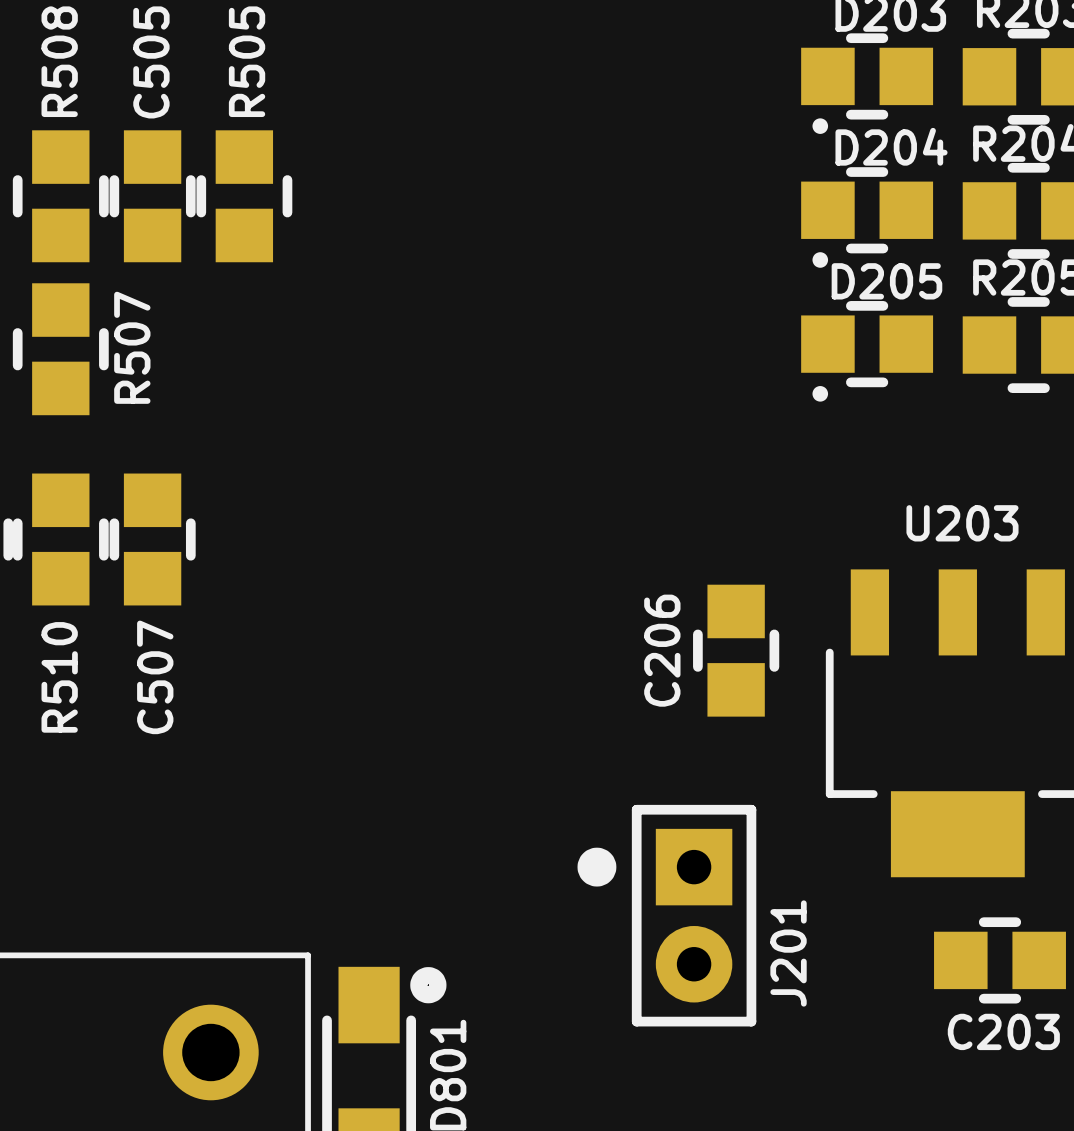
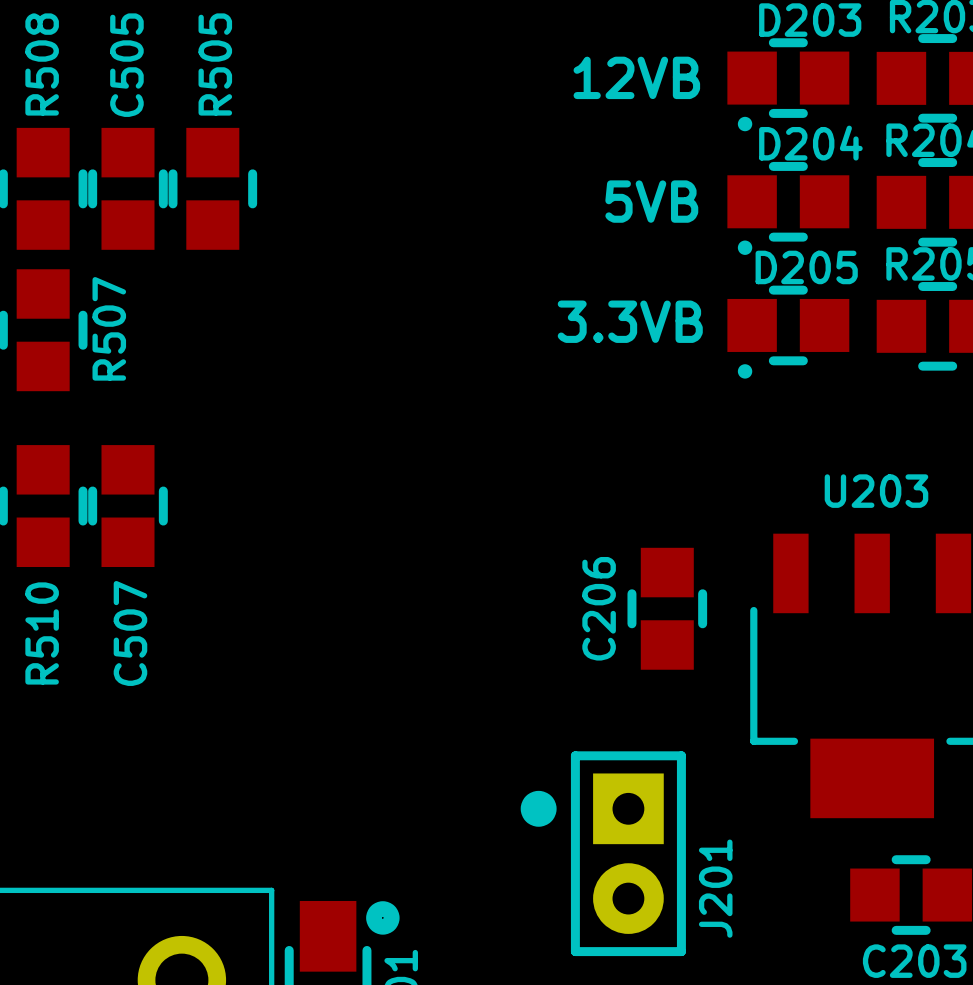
text: none -> 12VB (636, 77)
text: none -> 5VB (651, 201)
text: none -> 3.3VB (630, 321)

